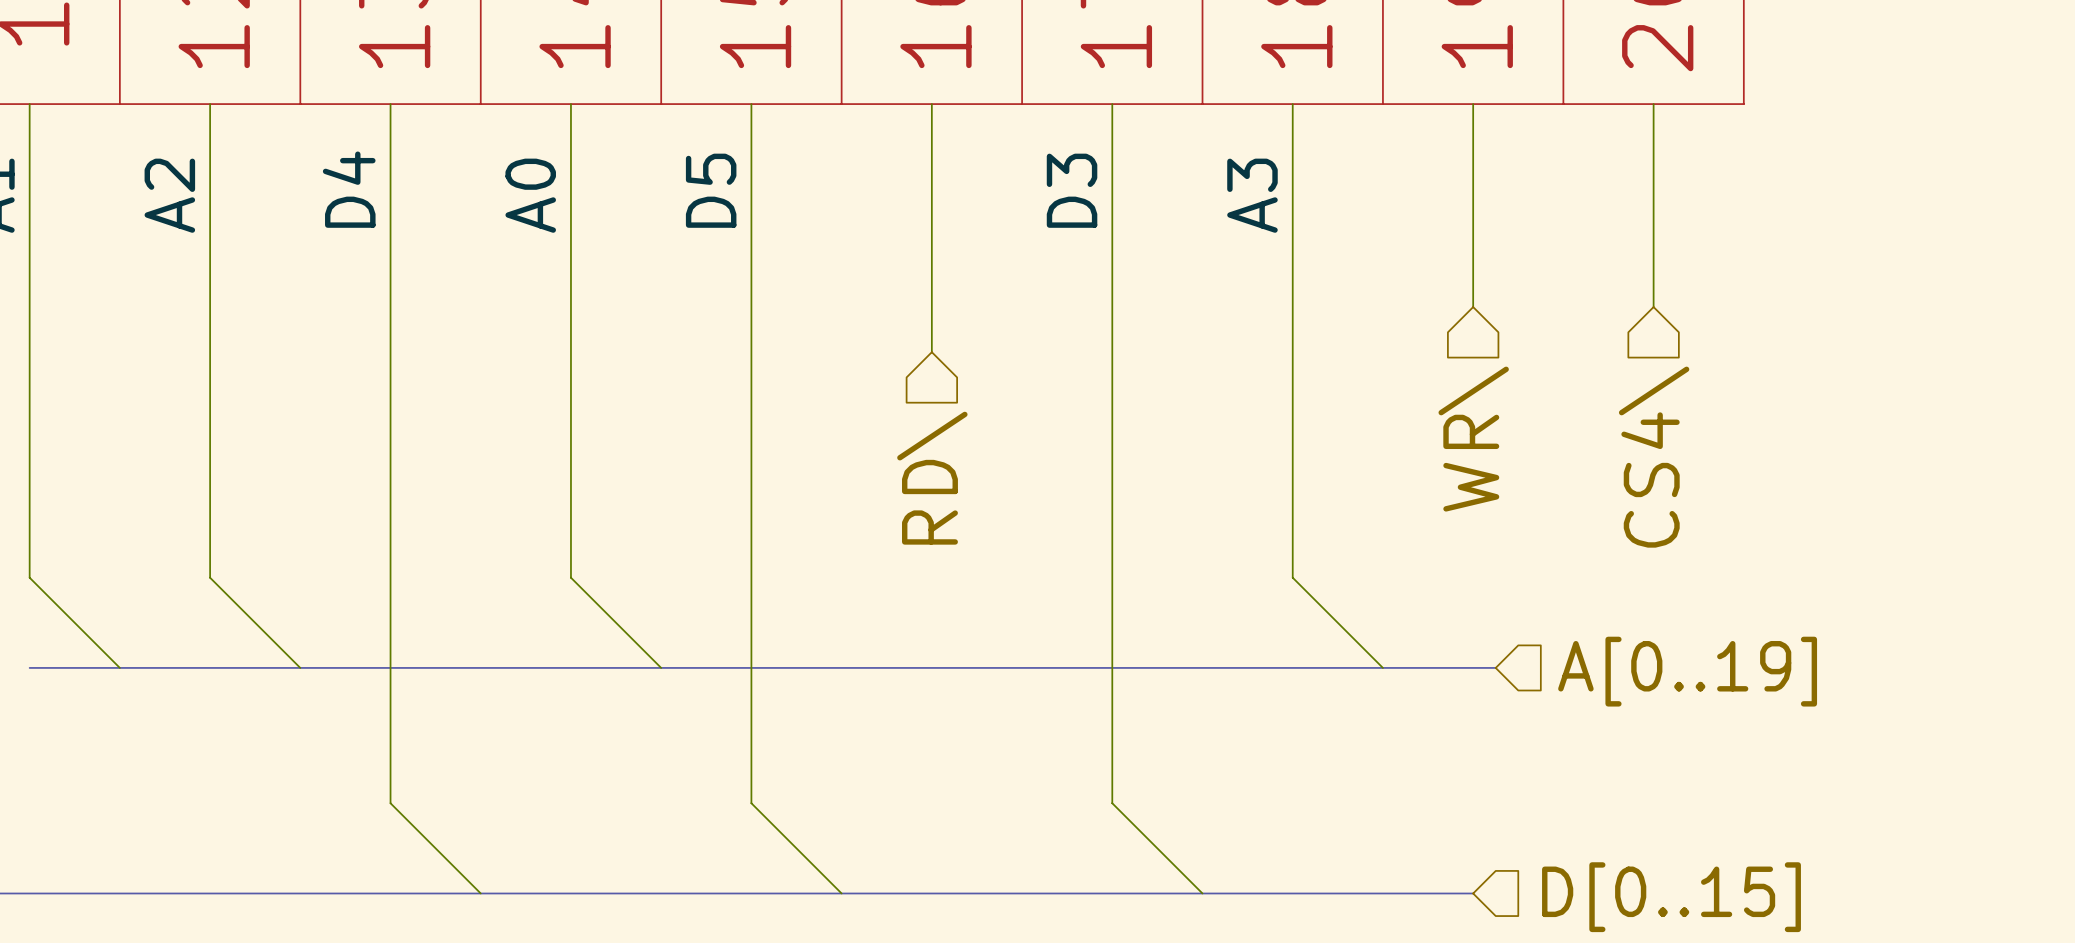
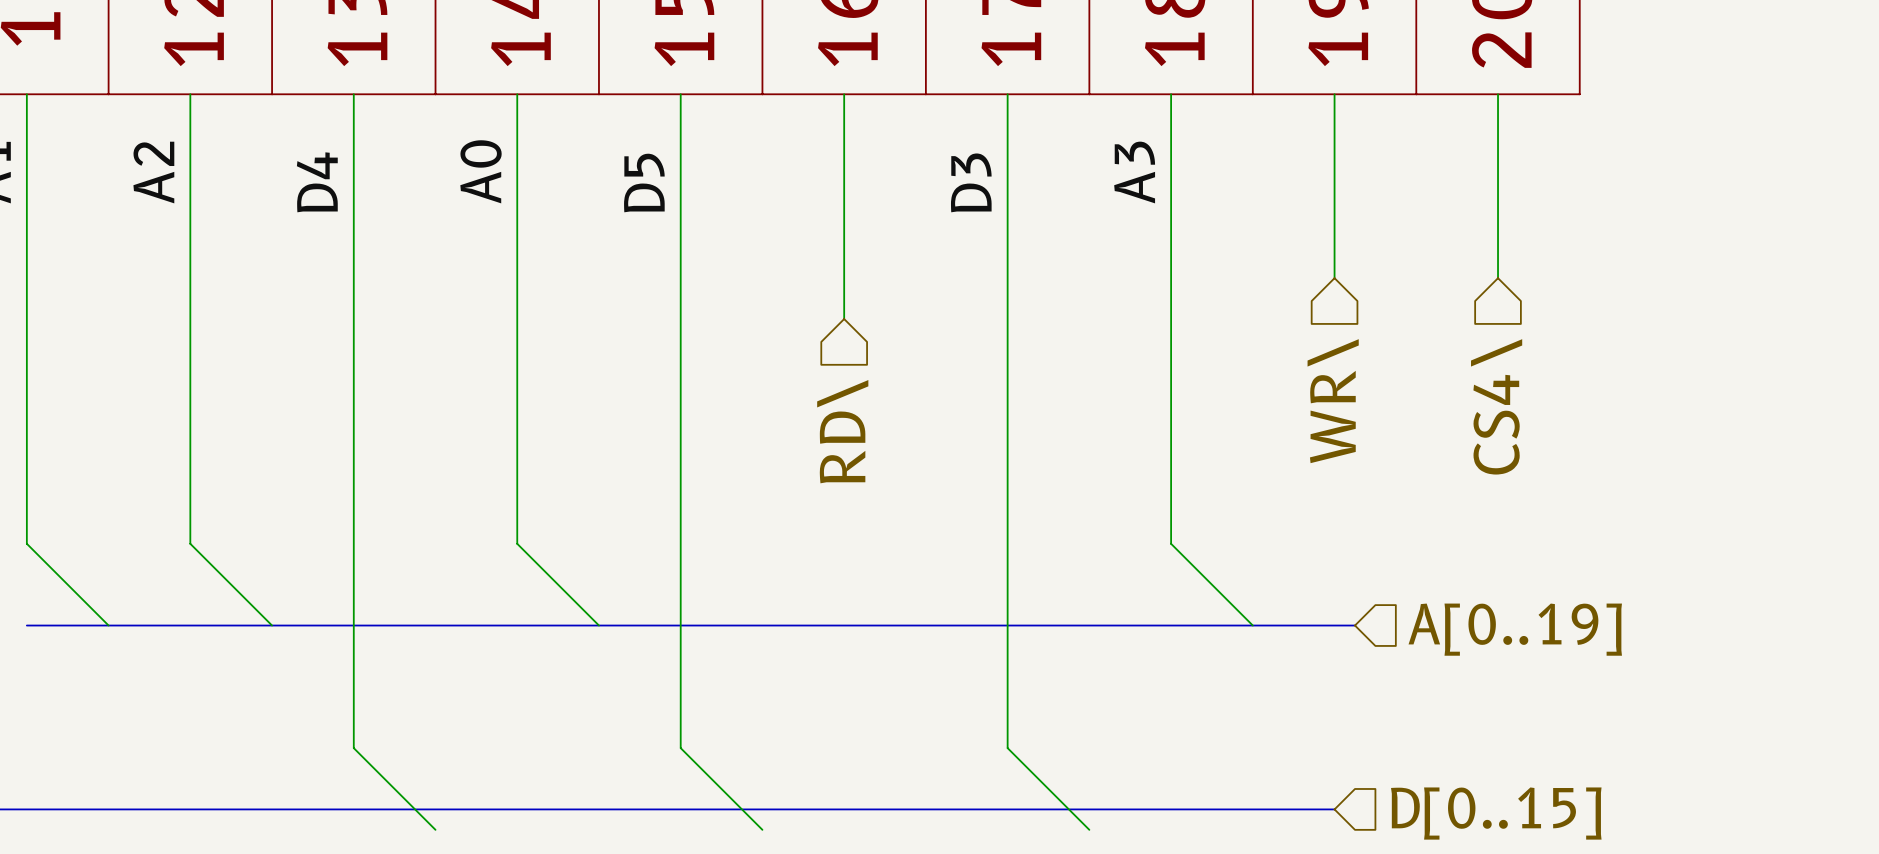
wire: (29, 577) (119, 667) -> (26, 523) (26, 543) (108, 625)
wire: (210, 577) (300, 667) -> (190, 523) (190, 543) (272, 625)
wire: (570, 577) (661, 667) -> (517, 523) (517, 543) (598, 625)
wire: (1292, 577) (1382, 667) -> (1171, 523) (1171, 543) (1252, 625)
bus: (29, 667) (1495, 667) -> (26, 625) (1354, 625)
hierarchical label position: A[0..19] (1687, 671) -> A[0..19] (1515, 629)
wire: (390, 803) (480, 893) -> (353, 727) (353, 748) (435, 829)
wire: (751, 803) (841, 893) -> (680, 727) (680, 748) (762, 829)
wire: (1112, 803) (1202, 893) -> (1007, 727) (1007, 748) (1089, 829)

